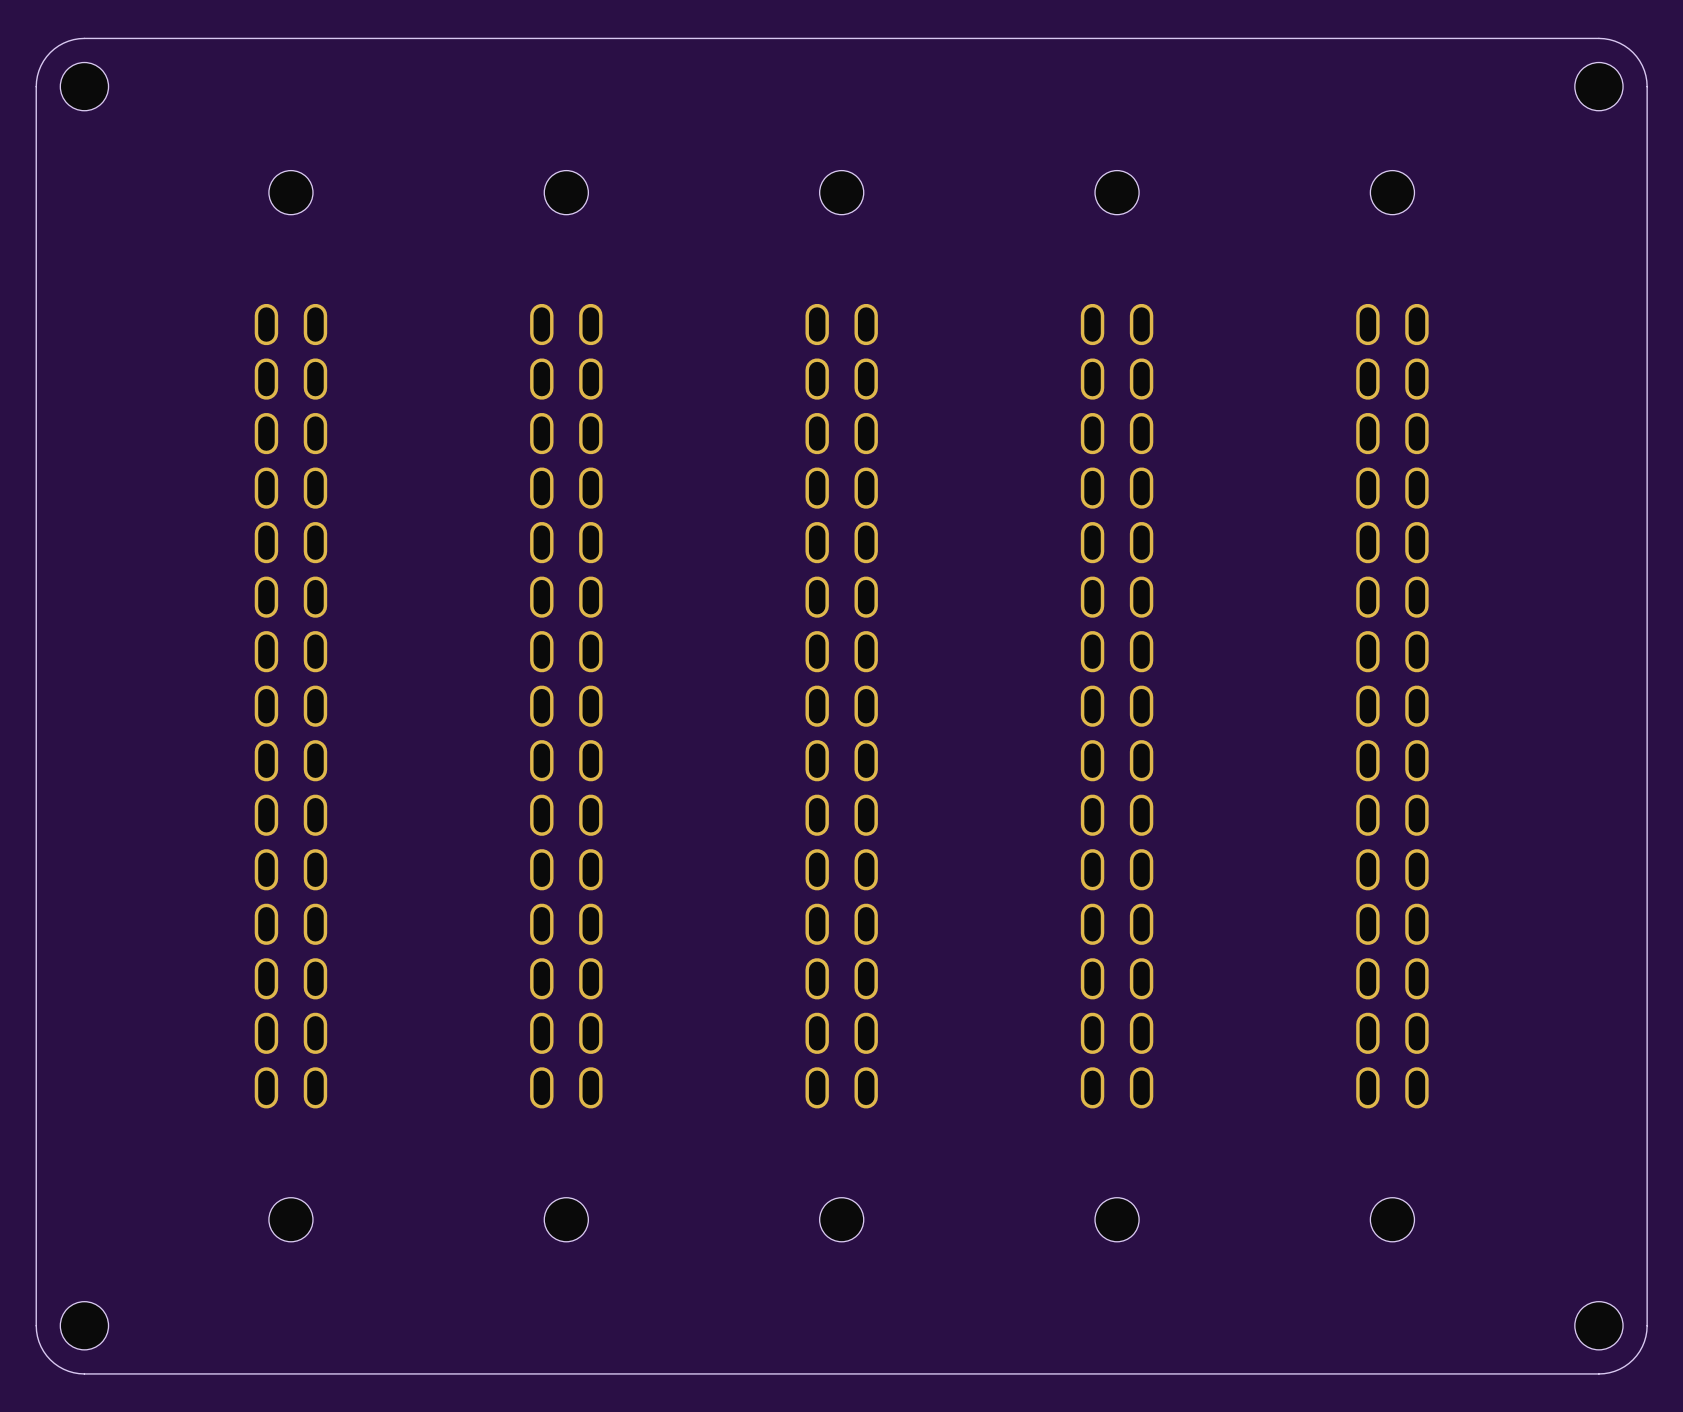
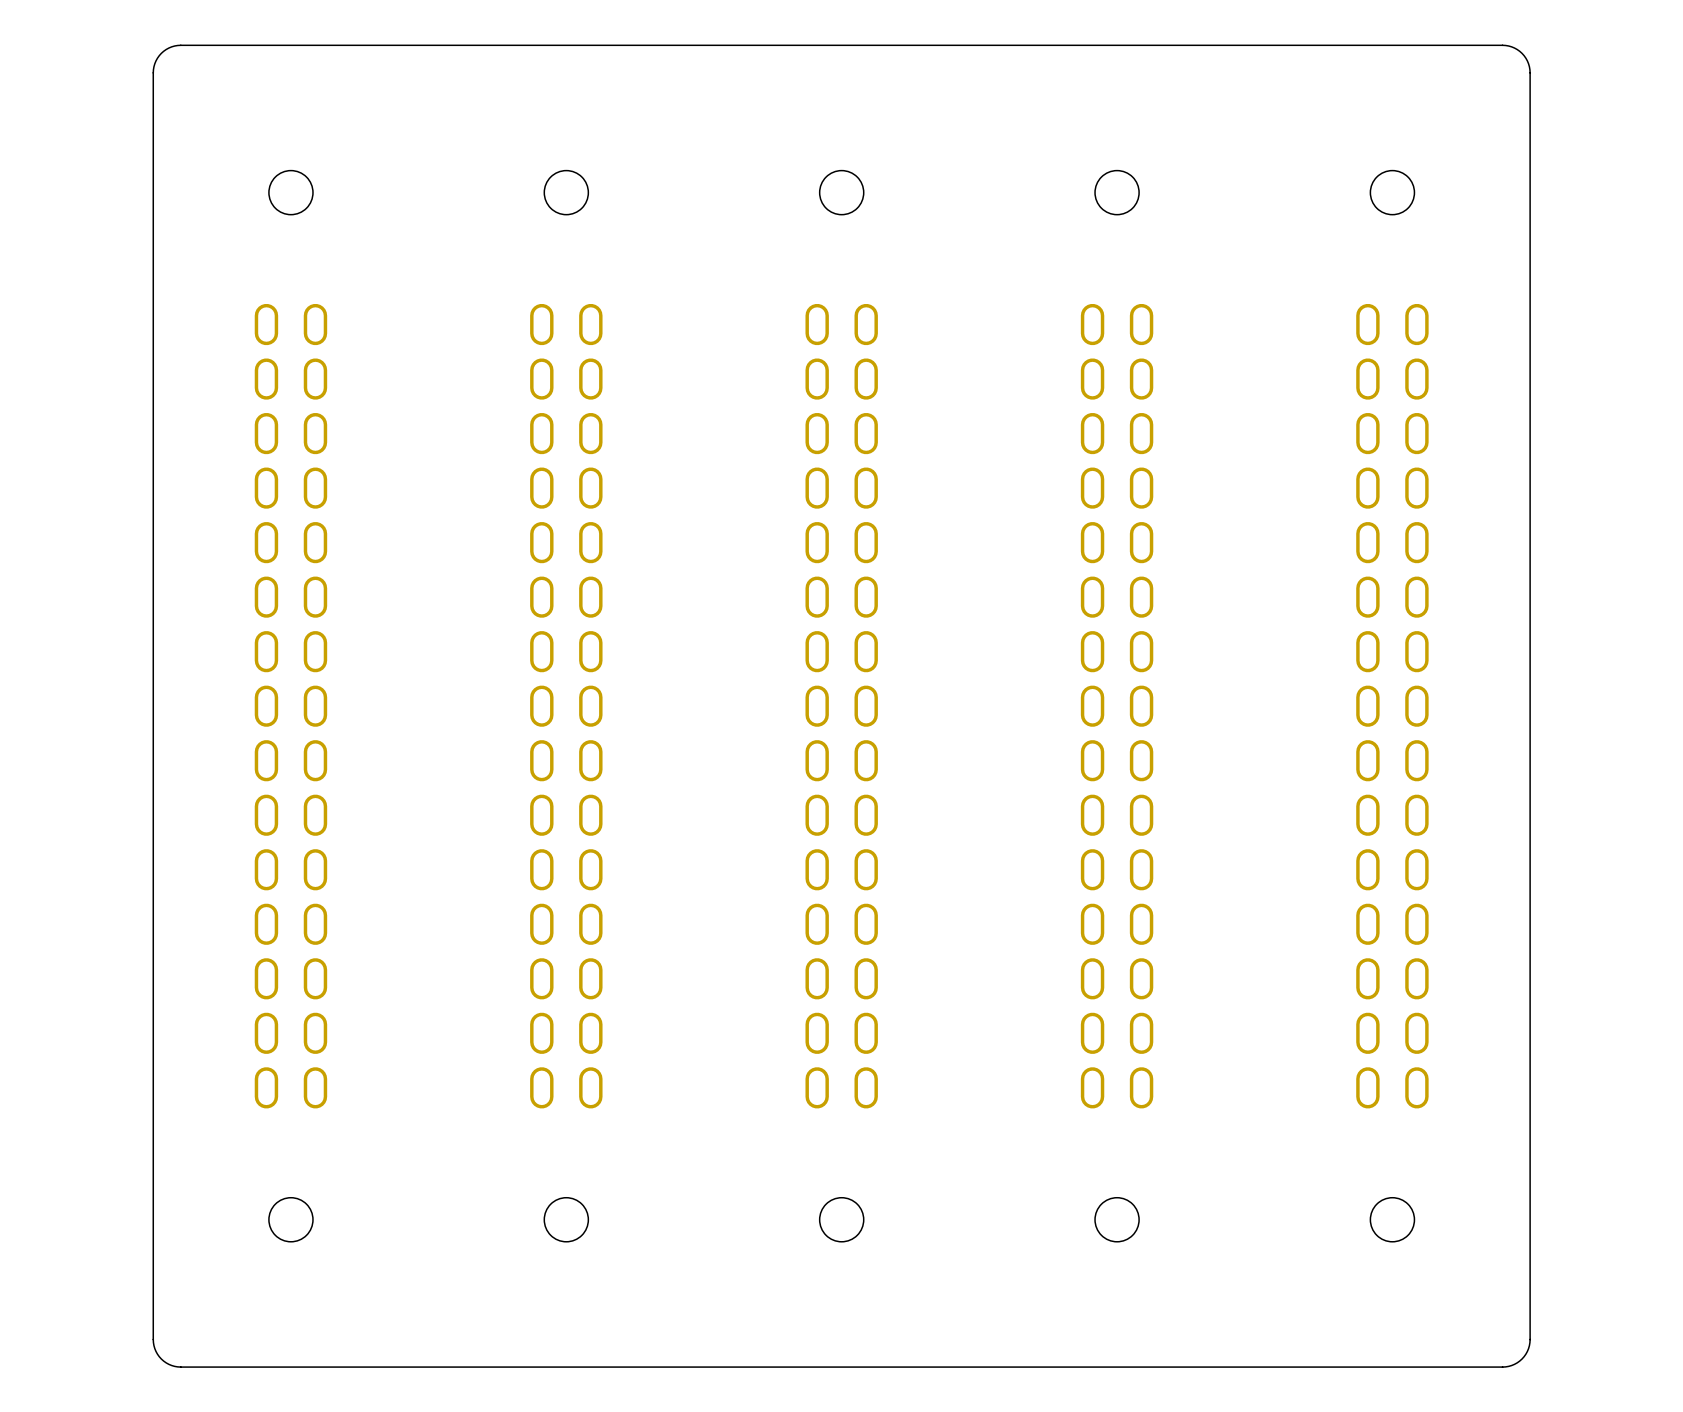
board edge: (1598, 38) (84, 38) (68, 41) (54, 48) (41, 65) (36, 86) (36, 1325) (38, 1341) (46, 1355) (63, 1369) (84, 1373) (1598, 1373) (1614, 1371) (1628, 1363) (1642, 1346) (1647, 1325) (1647, 86) (1642, 65) (1633, 52) (1614, 41) (1598, 38) -> (1502, 45) (1511, 46) (1522, 53) (1528, 63) (1530, 72) (1530, 1339) (1528, 1348) (1522, 1359) (1511, 1365) (1502, 1367) (180, 1367) (168, 1364) (161, 1359) (156, 1351) (153, 1339) (153, 72) (154, 63) (161, 53) (171, 46) (180, 45) (1502, 45)
part: (84, 86) -> none
part: (1598, 86) -> none
part: (84, 1325) -> none
part: (1598, 1325) -> none

